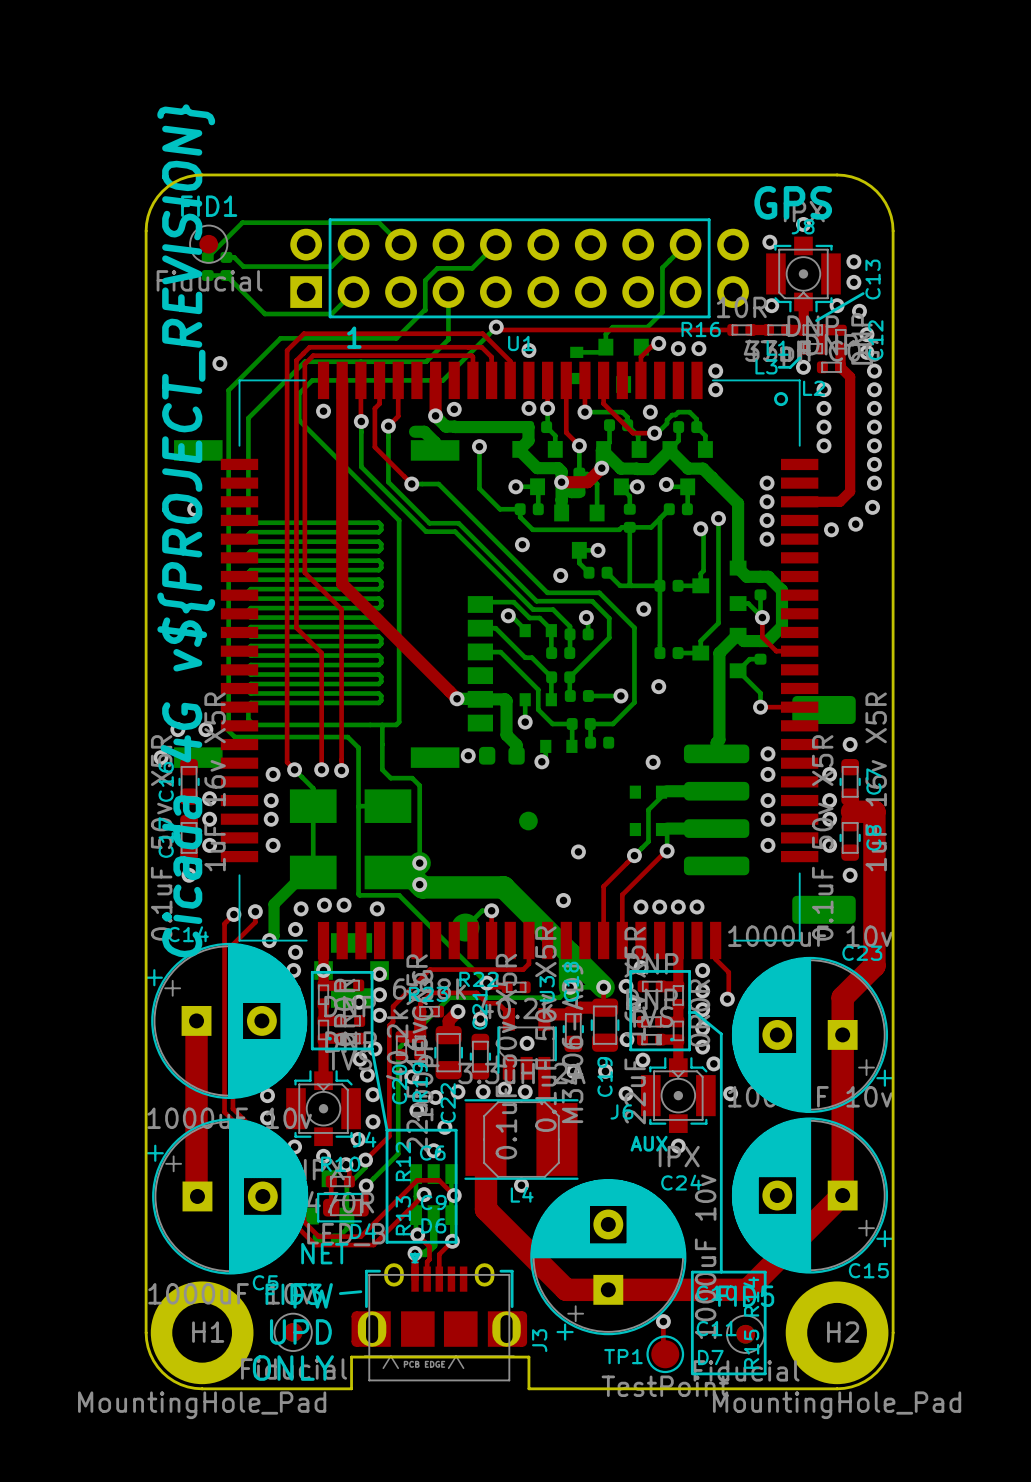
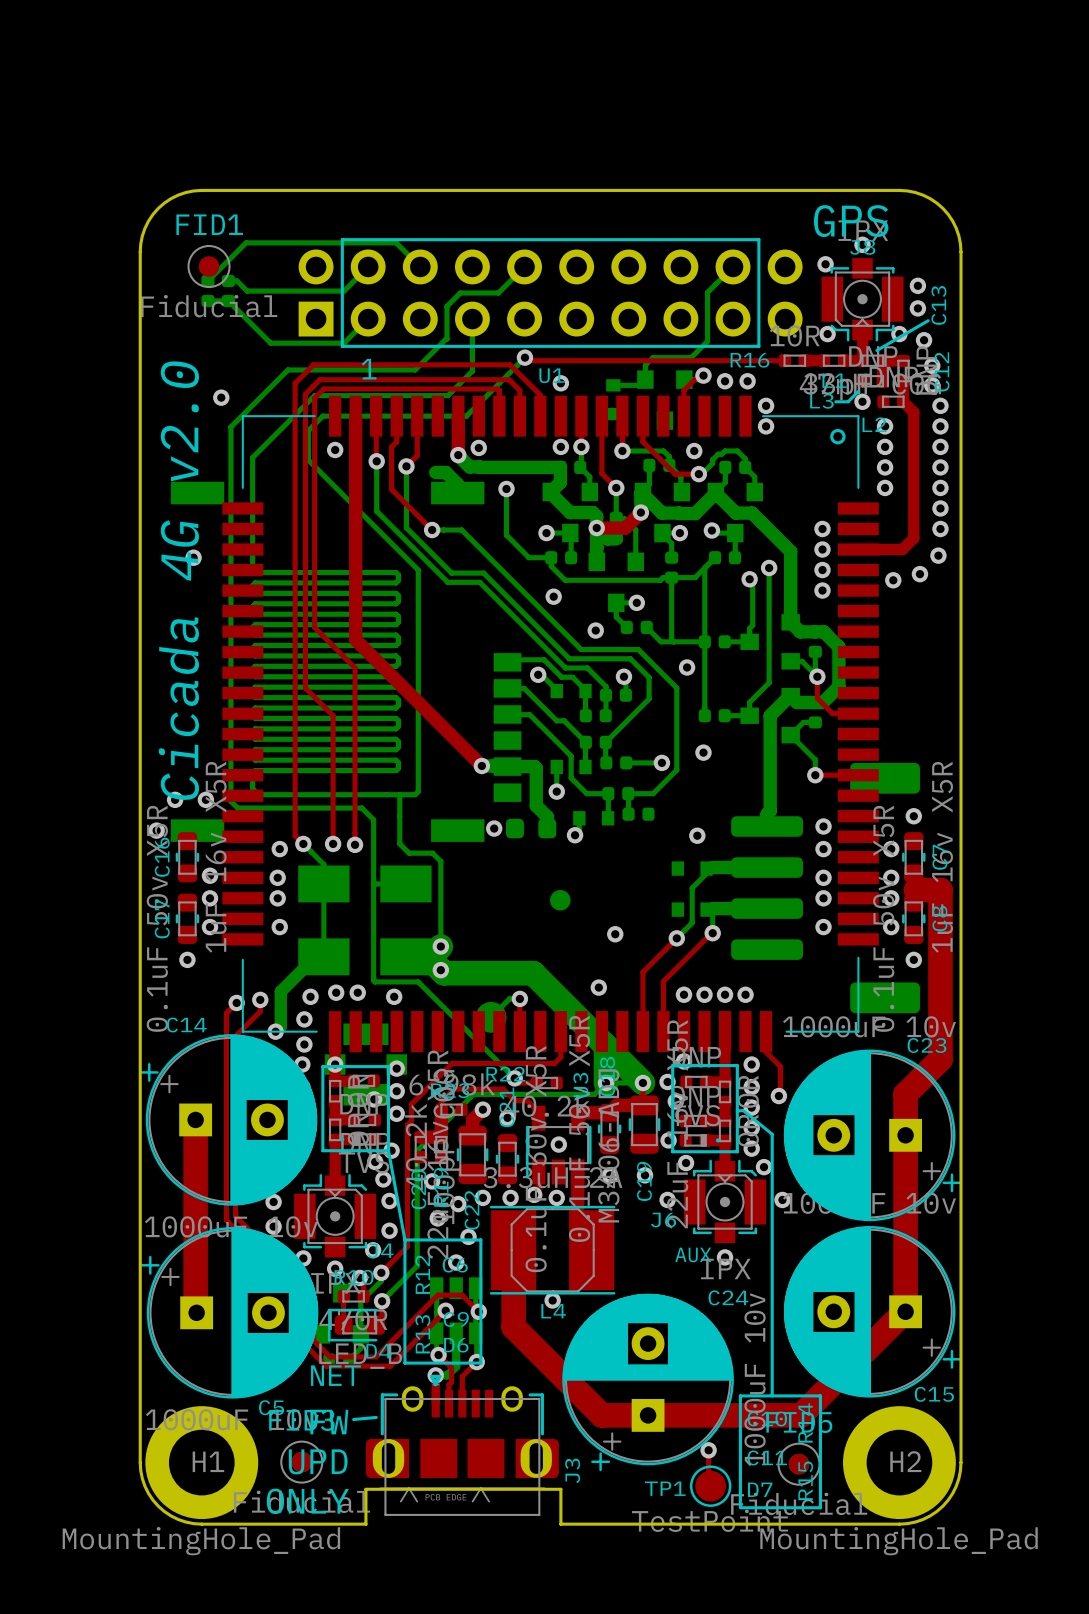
text: Cicada 4G v${PROJECT_REVISION} (186, 530) -> Cicada 4G v2.0 (178, 580)

